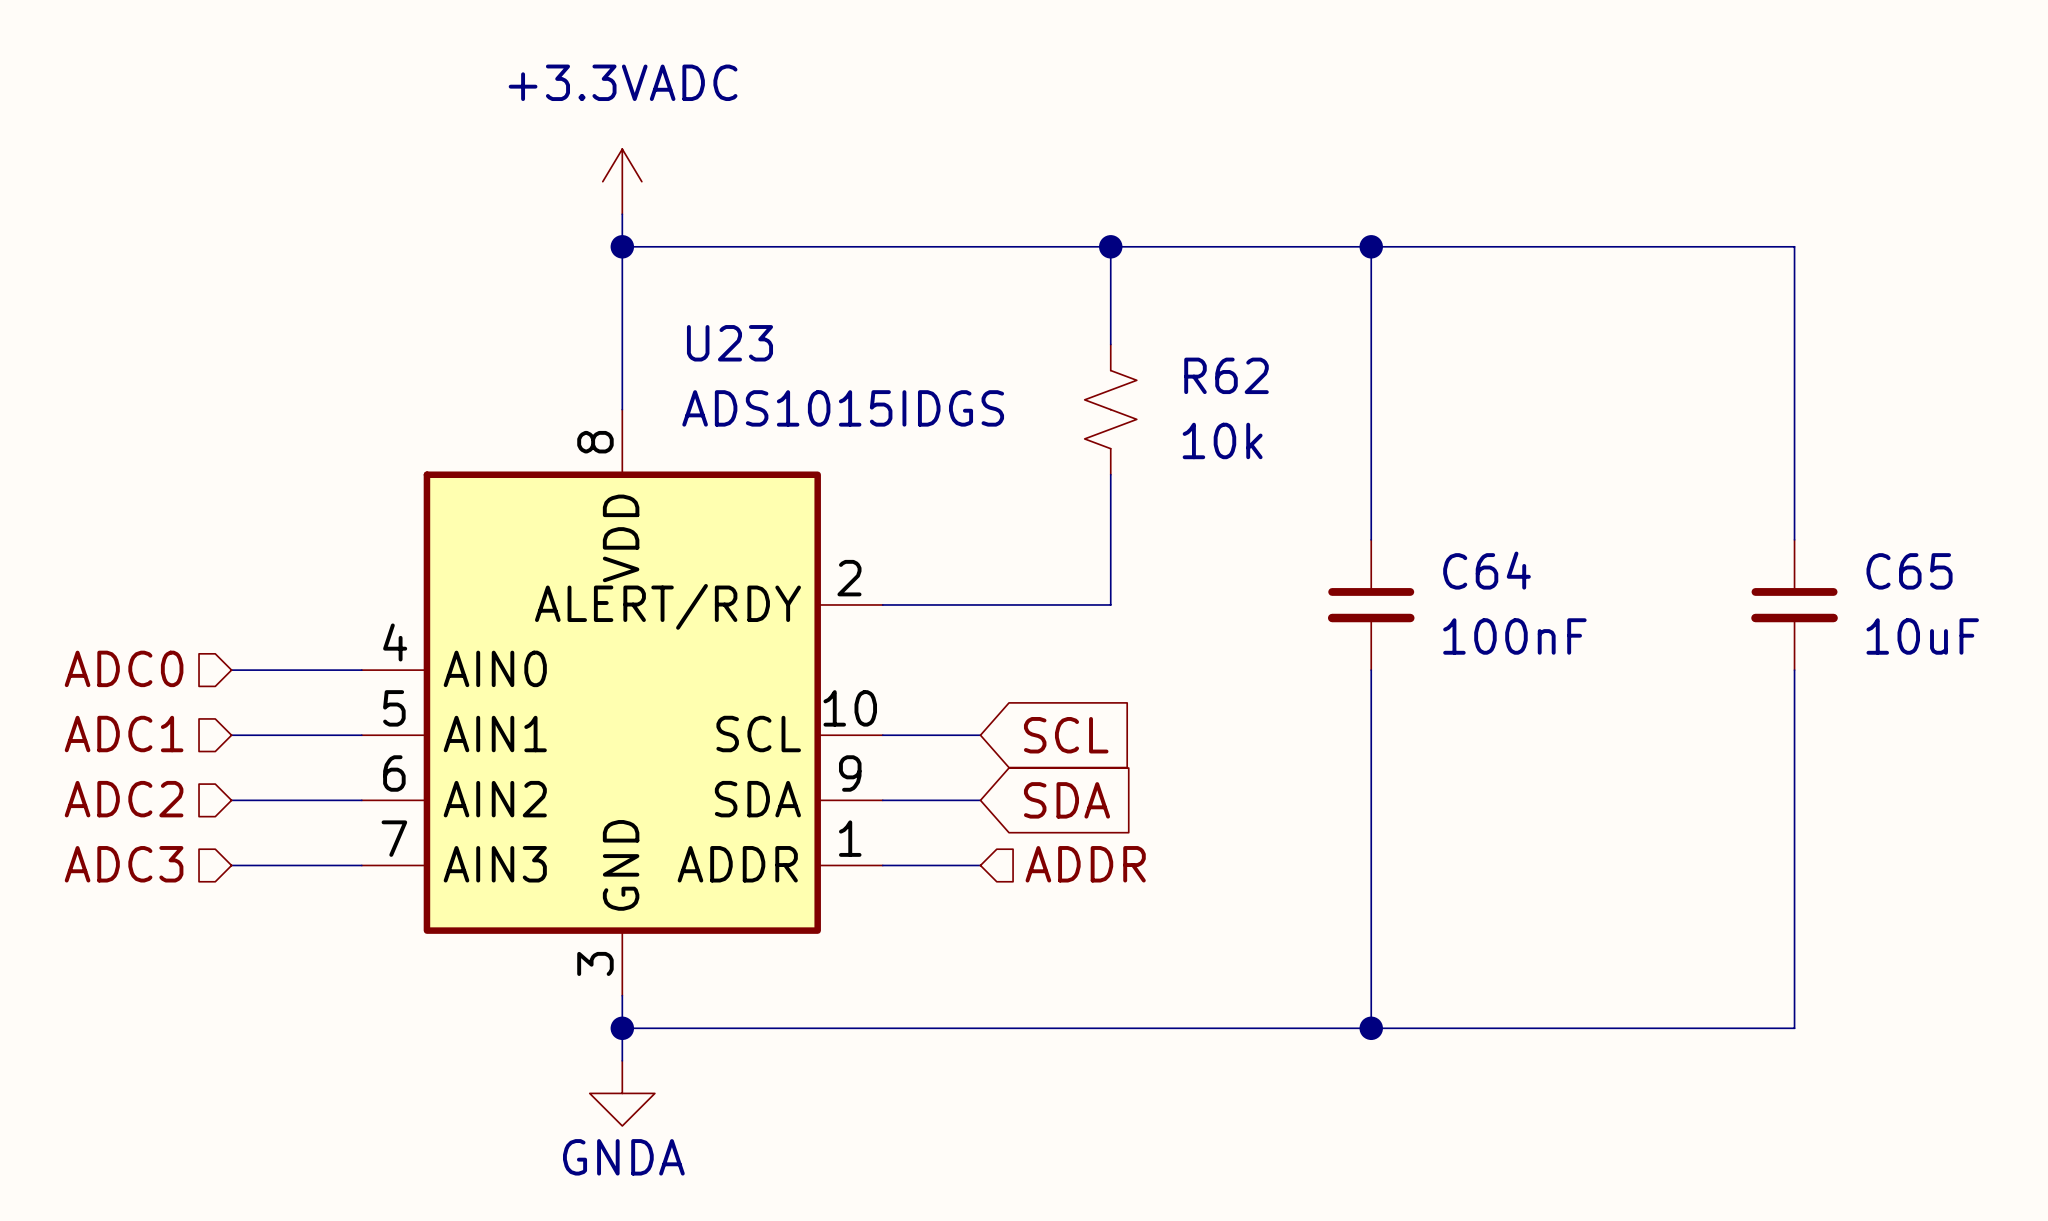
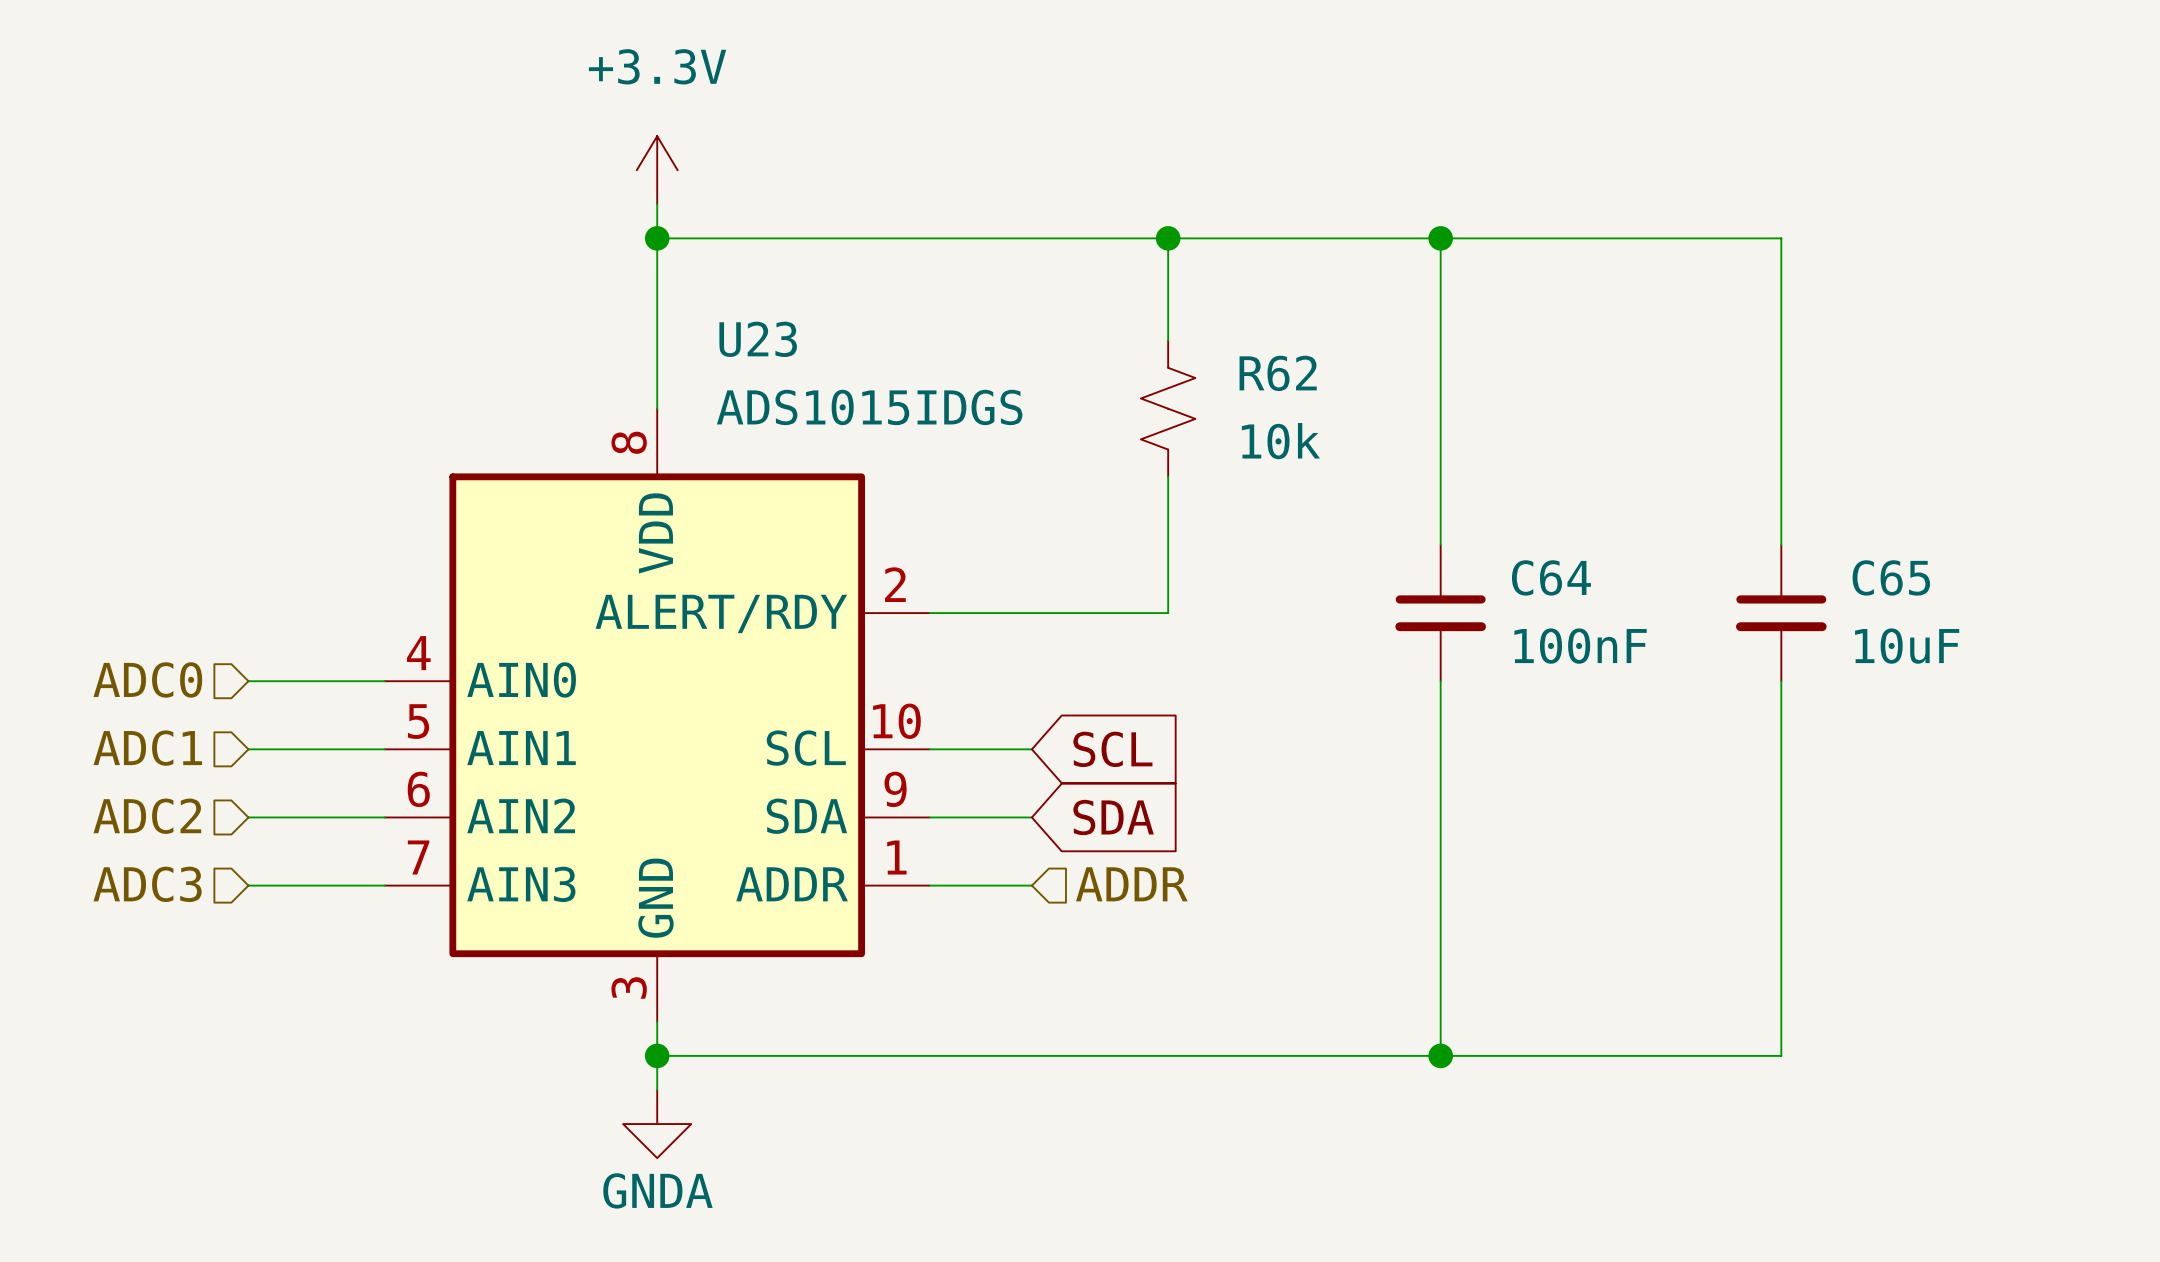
power symbol: +3.3VADC (622, 181) -> +3.3V (657, 170)
wire: (1696, 246) (1794, 246) (1794, 539) -> (1781, 238) (1781, 544)
C65 position: (1794, 604) -> (1781, 613)
wire: (1794, 670) (1794, 1028) (1696, 1028) -> (1781, 681) (1781, 1055)

